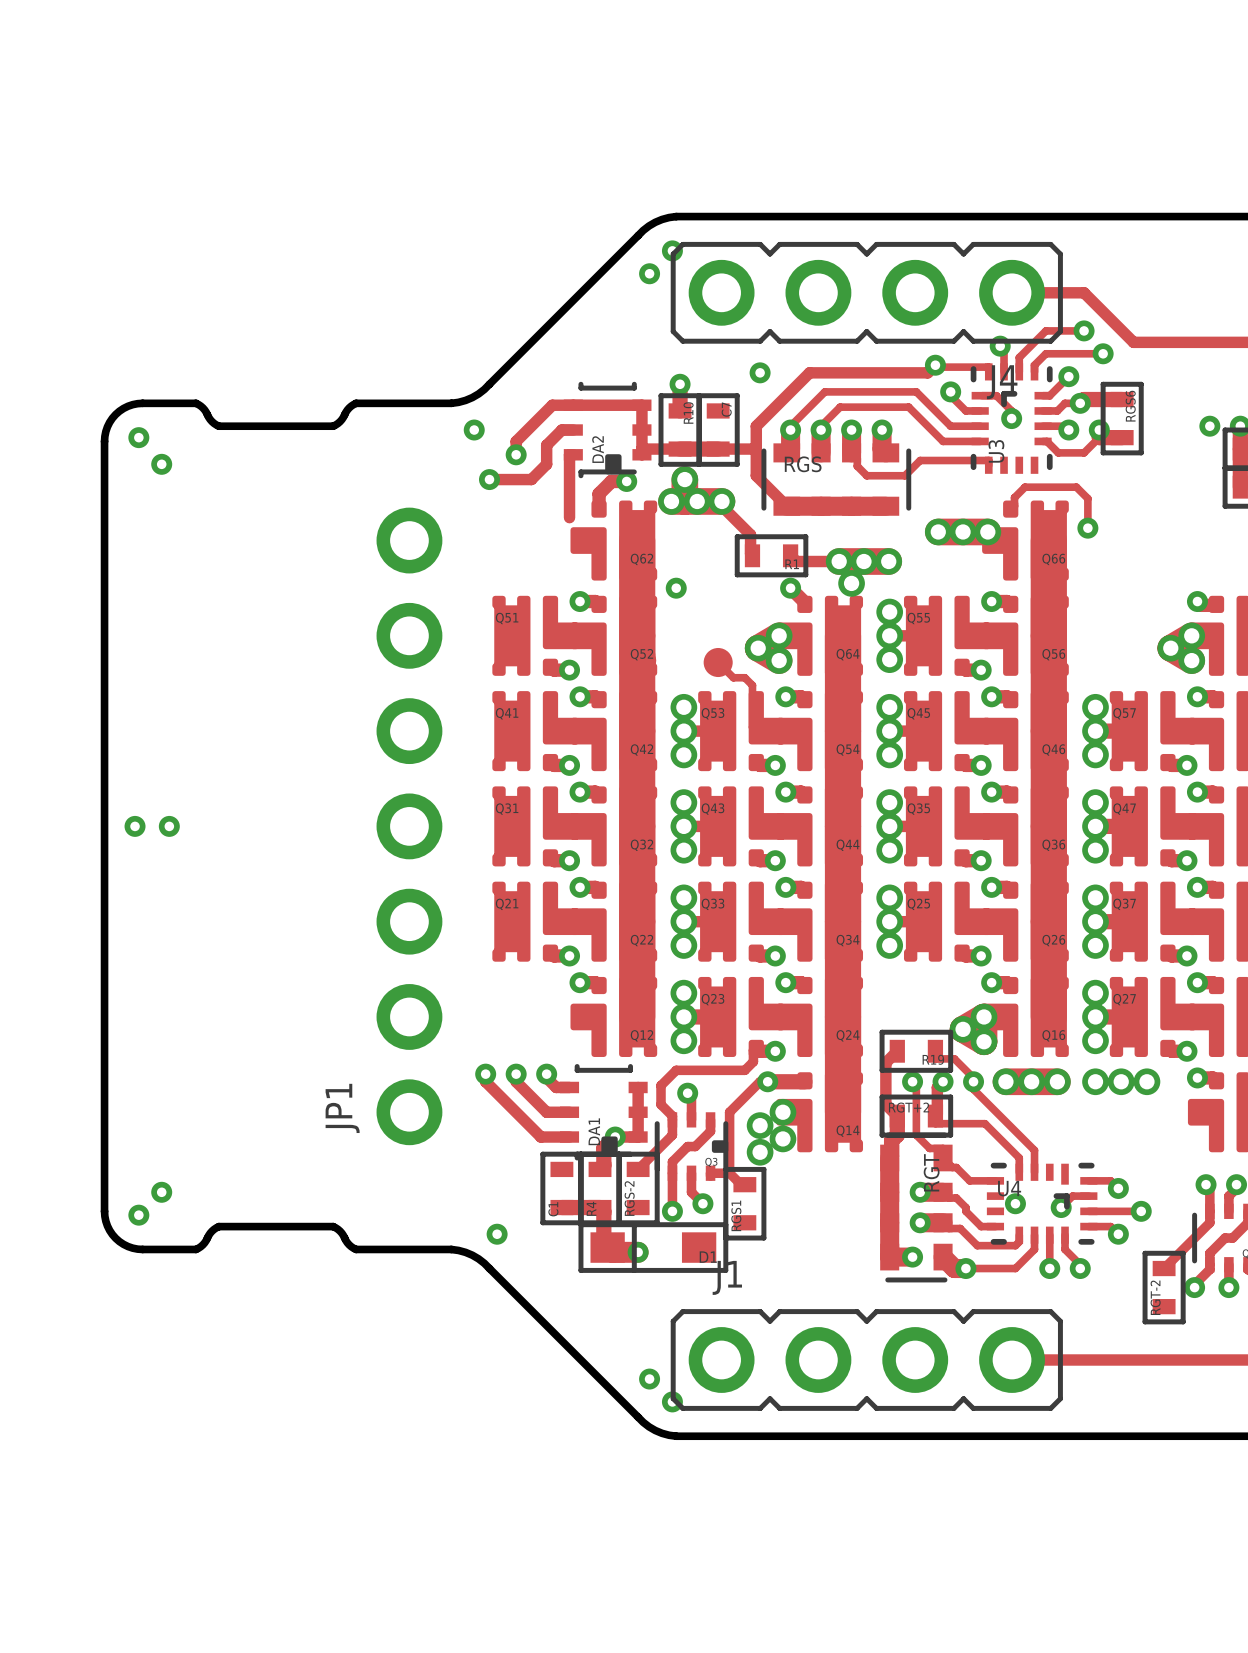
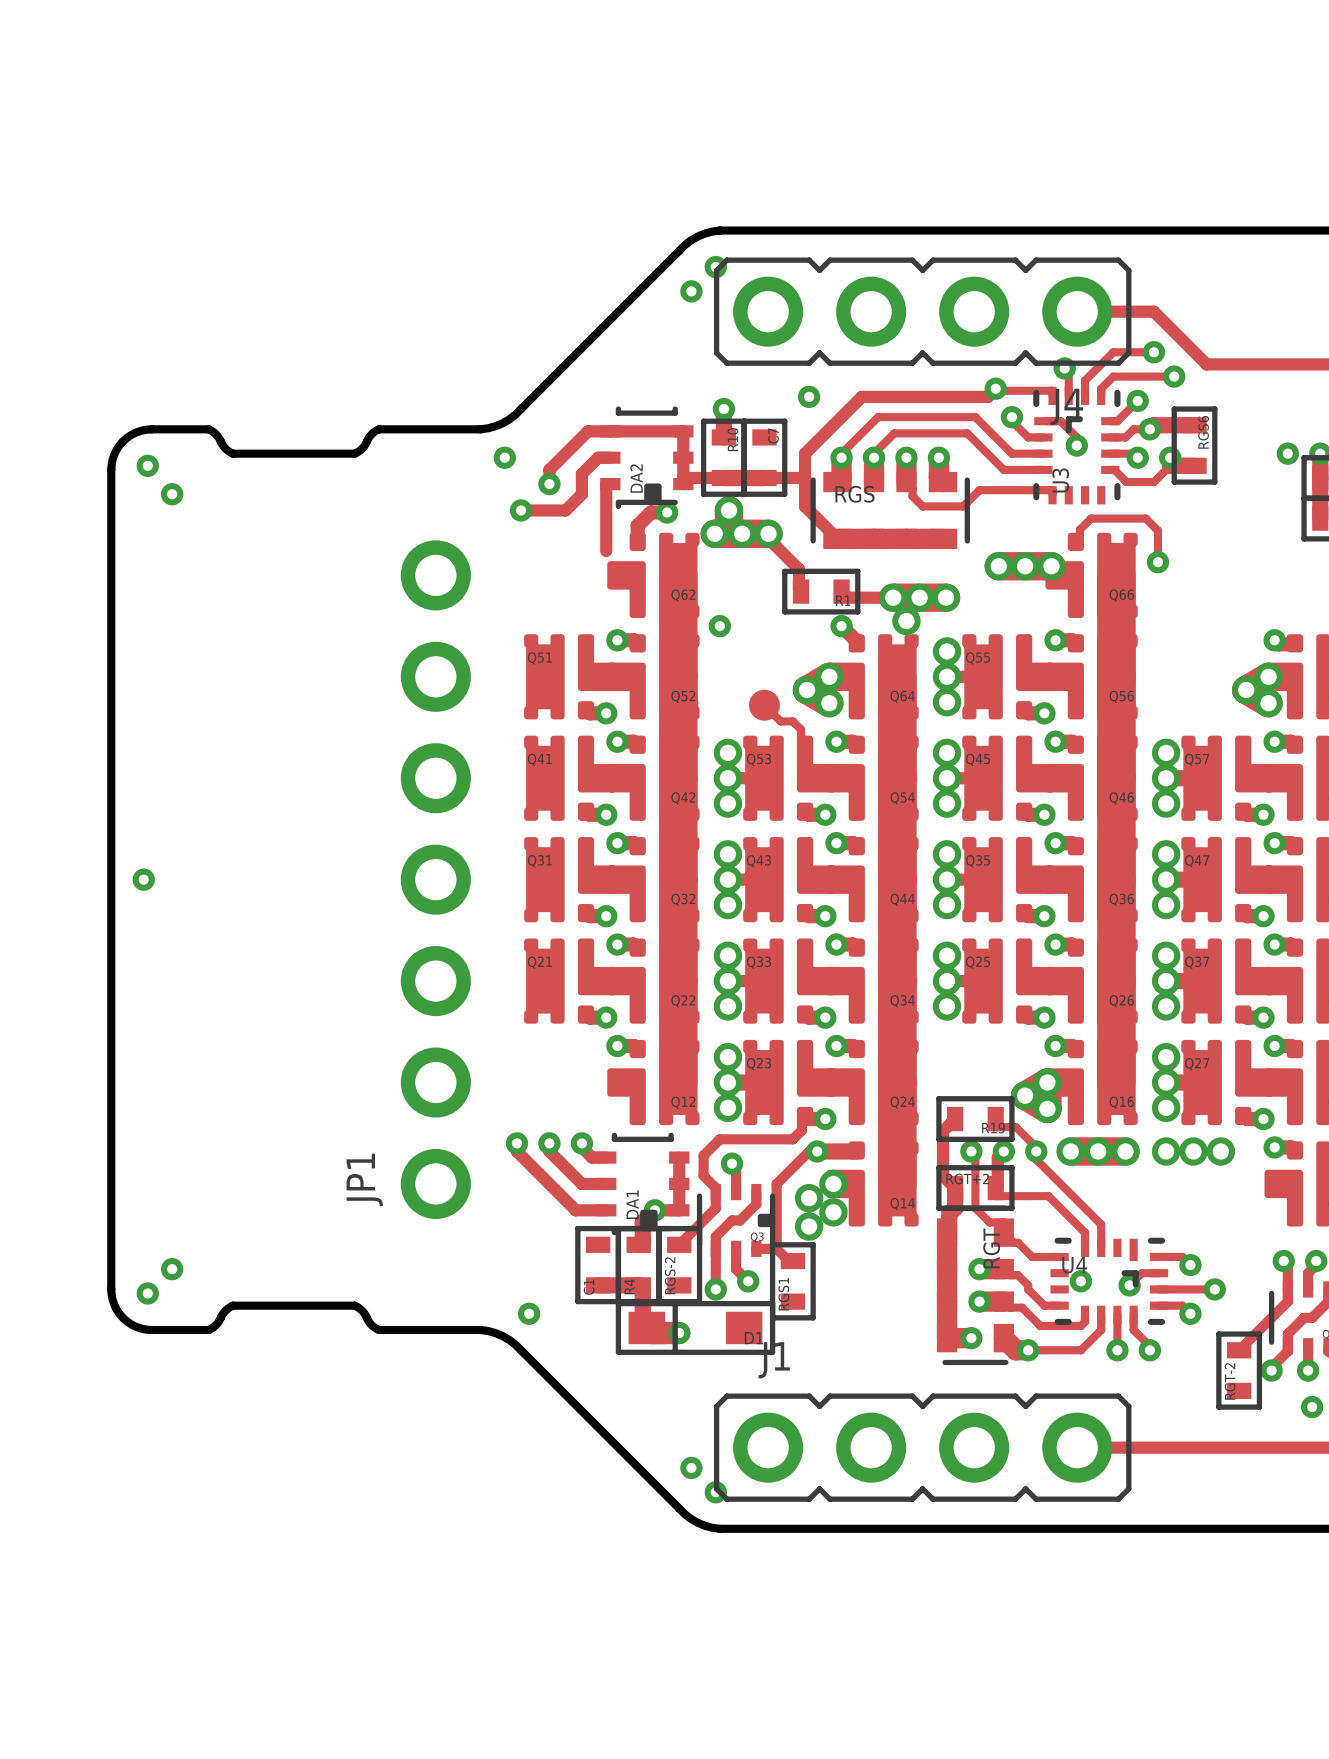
via: (169, 826) -> none
via: none -> (1312, 1407)

